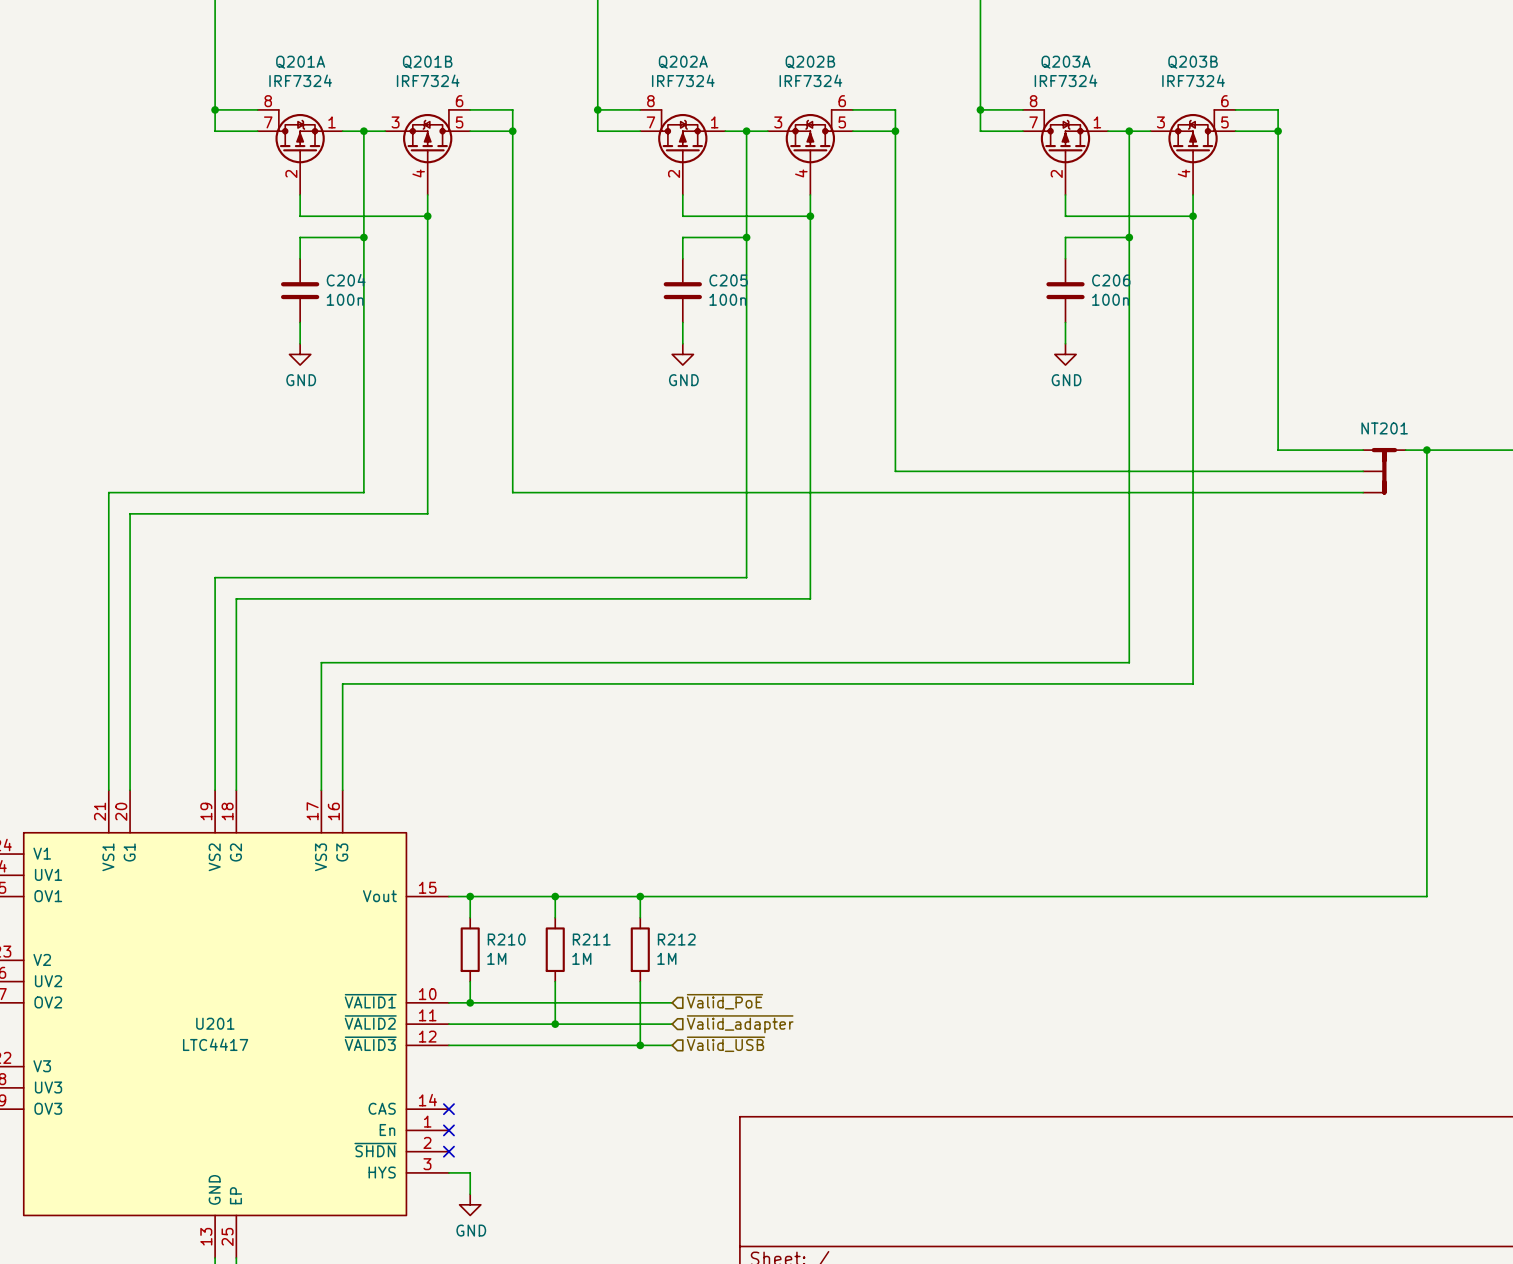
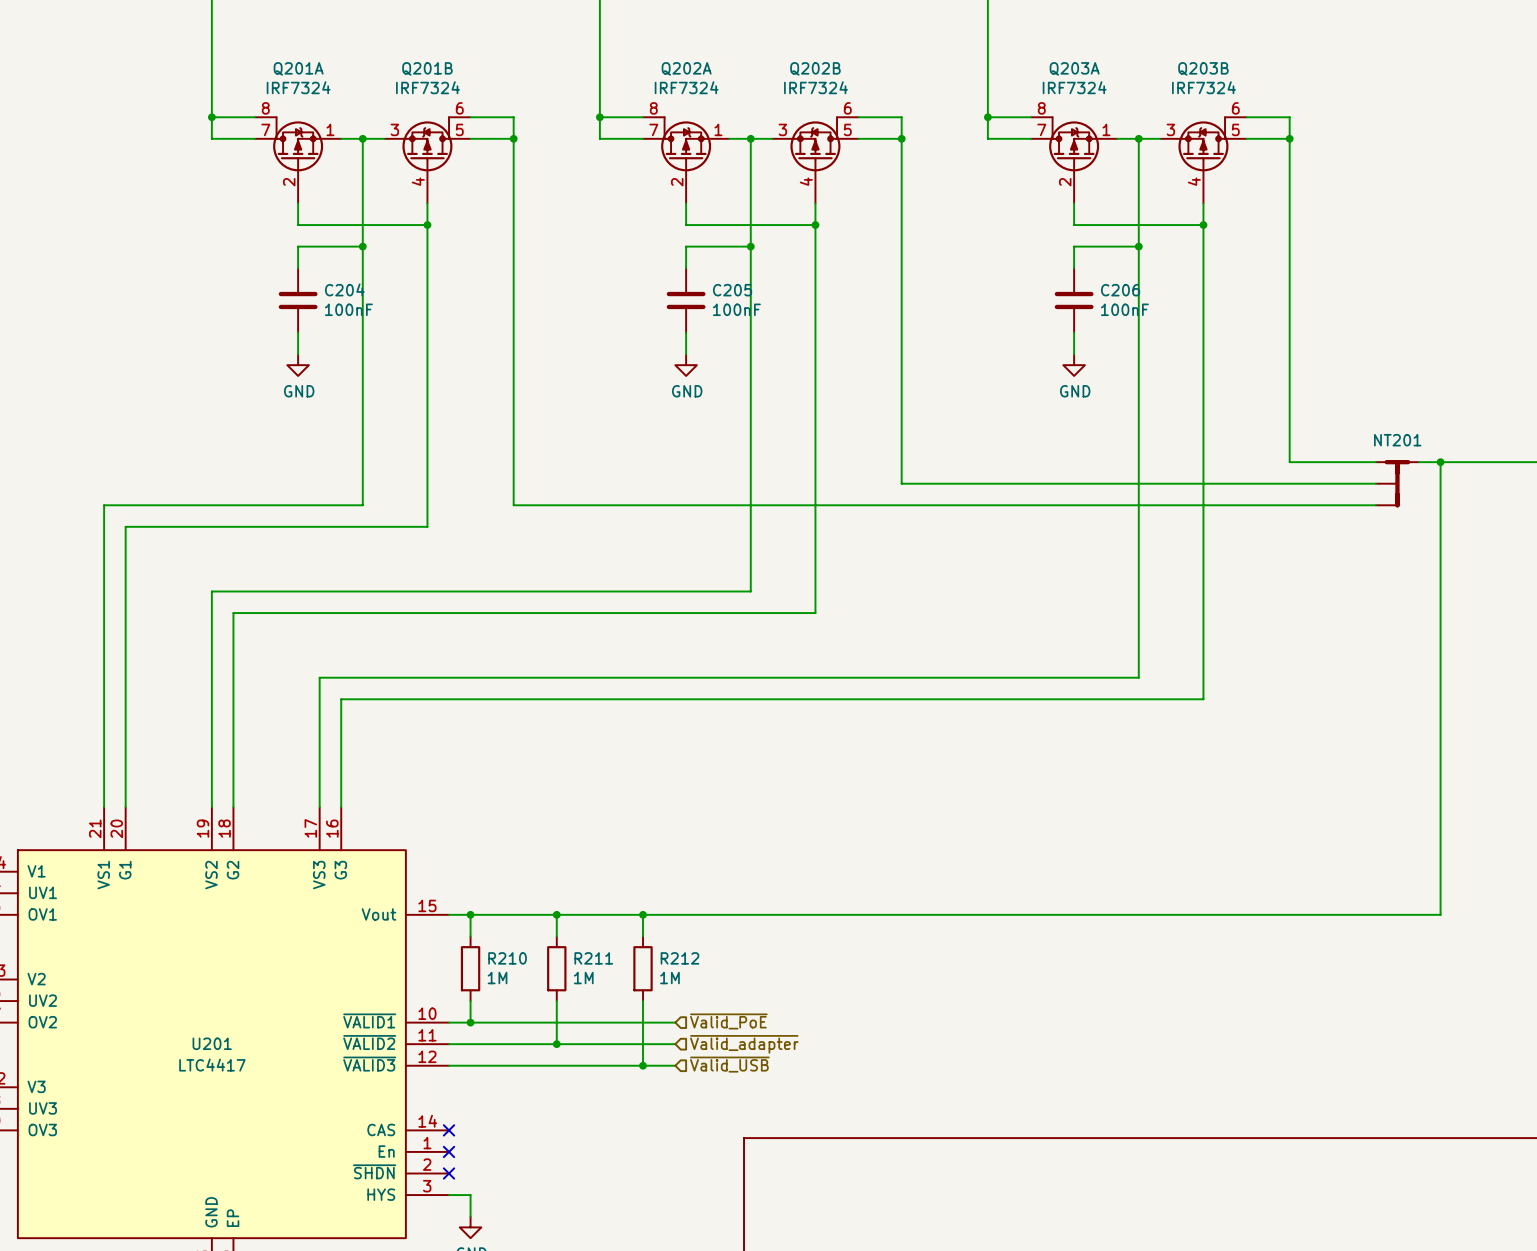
C204 value: 100n (345, 299) -> 100nF (348, 309)
C205 value: 100n (727, 299) -> 100nF (736, 309)
C206 value: 100n (1110, 299) -> 100nF (1124, 309)

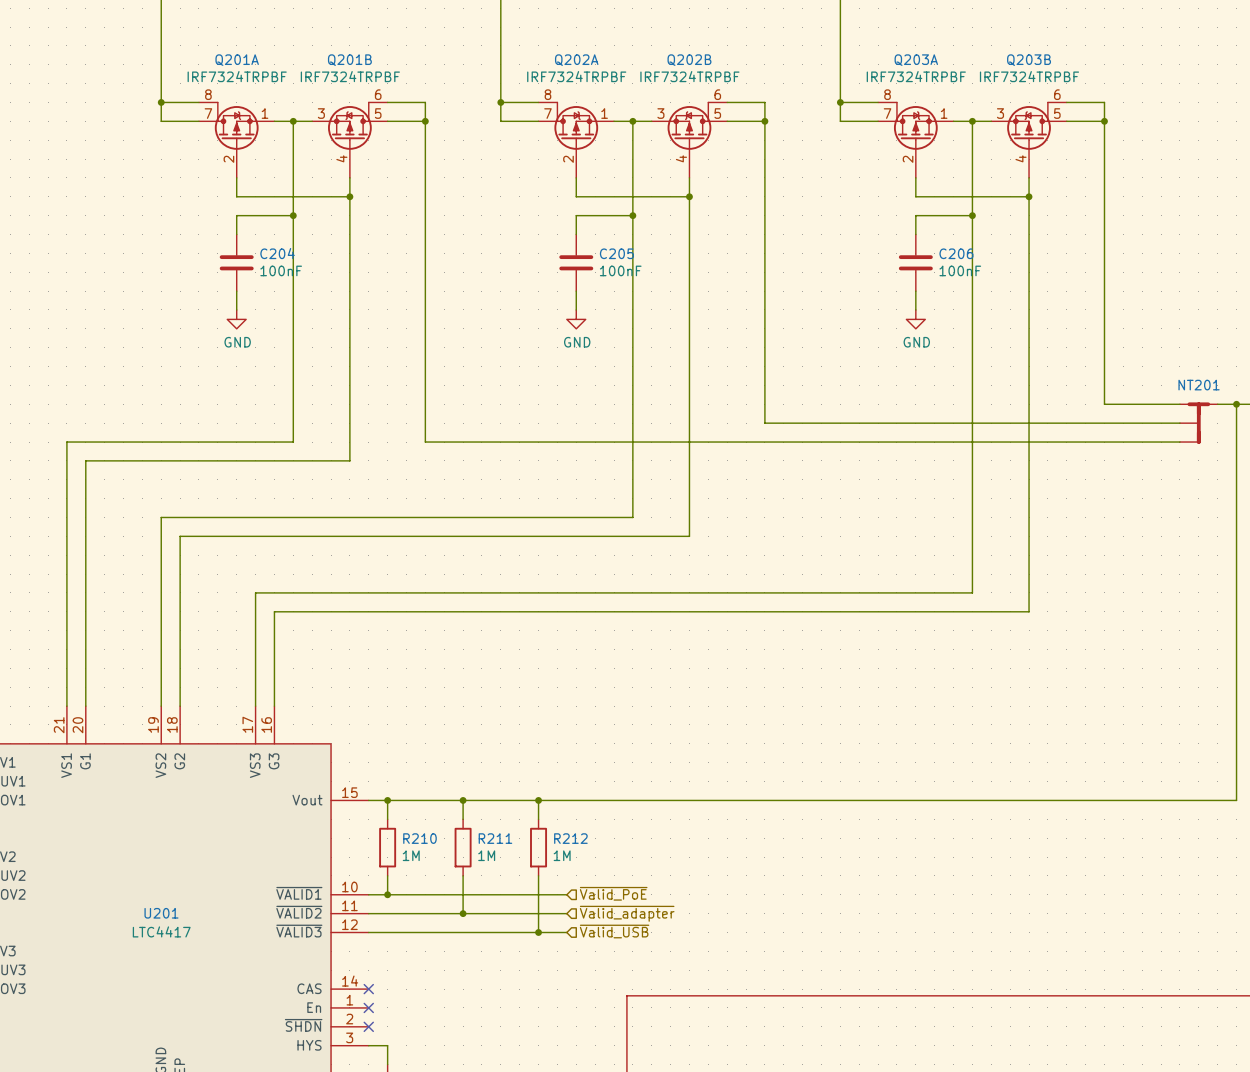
Q201A value: IRF7324 (298, 87) -> IRF7324TRPBF (237, 76)
Q201B value: IRF7324 (427, 87) -> IRF7324TRPBF (350, 76)
Q202A value: IRF7324 (686, 87) -> IRF7324TRPBF (576, 76)
Q202B value: IRF7324 (815, 87) -> IRF7324TRPBF (689, 76)
Q203A value: IRF7324 (1074, 87) -> IRF7324TRPBF (916, 76)
Q203B value: IRF7324 (1203, 87) -> IRF7324TRPBF (1029, 76)

